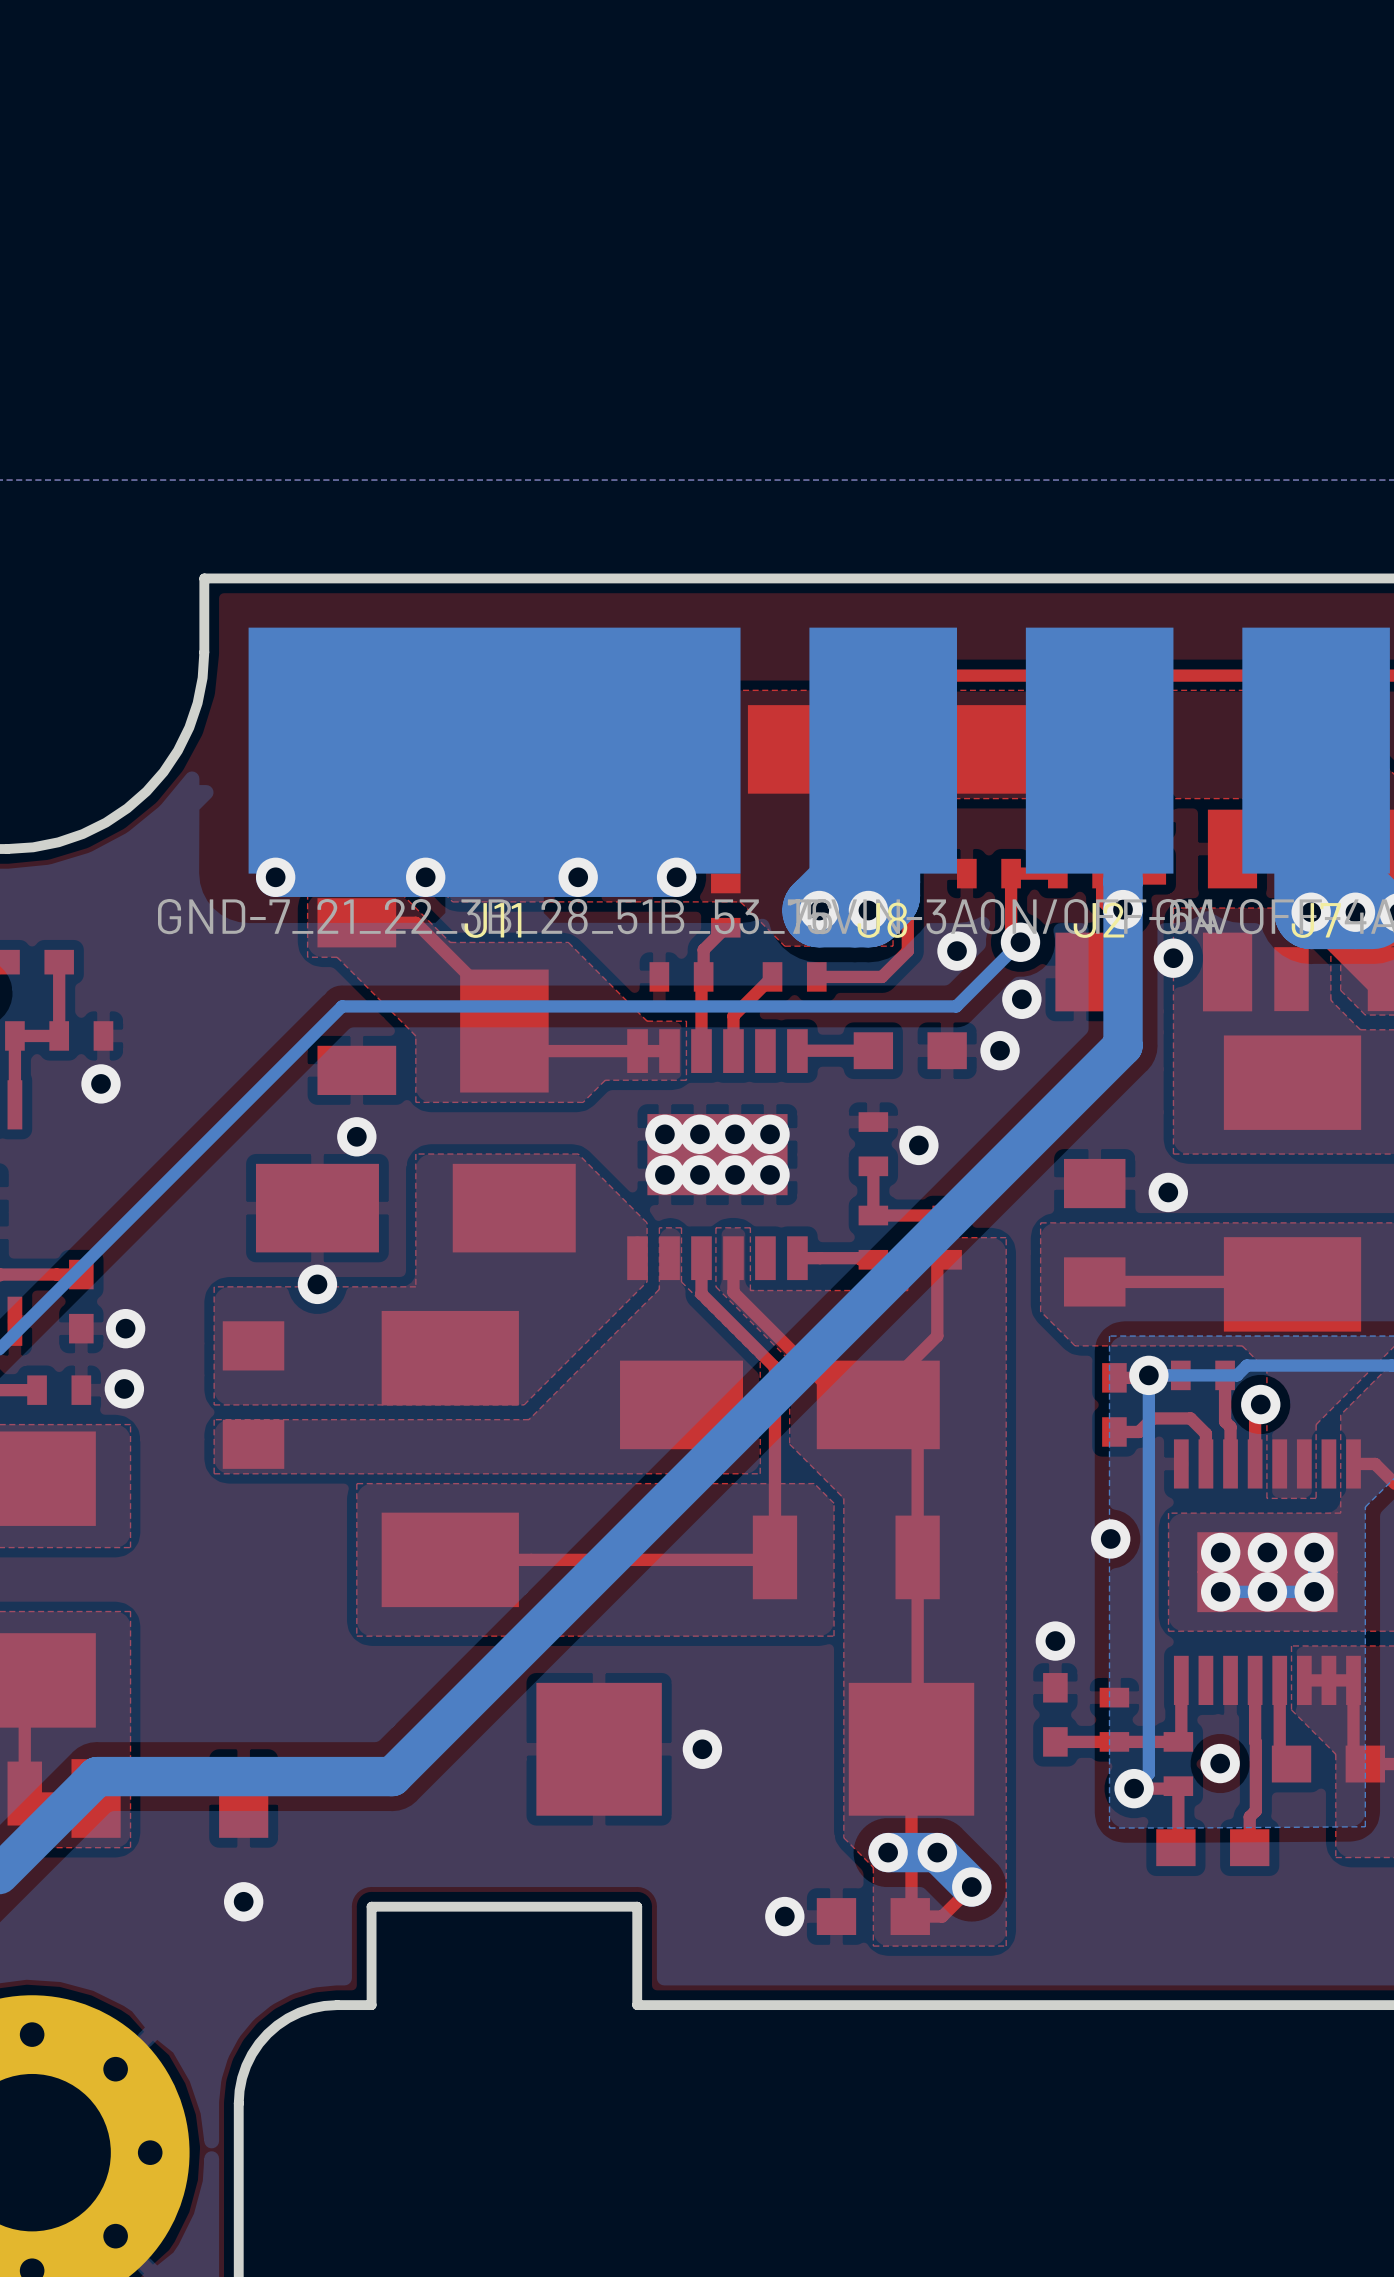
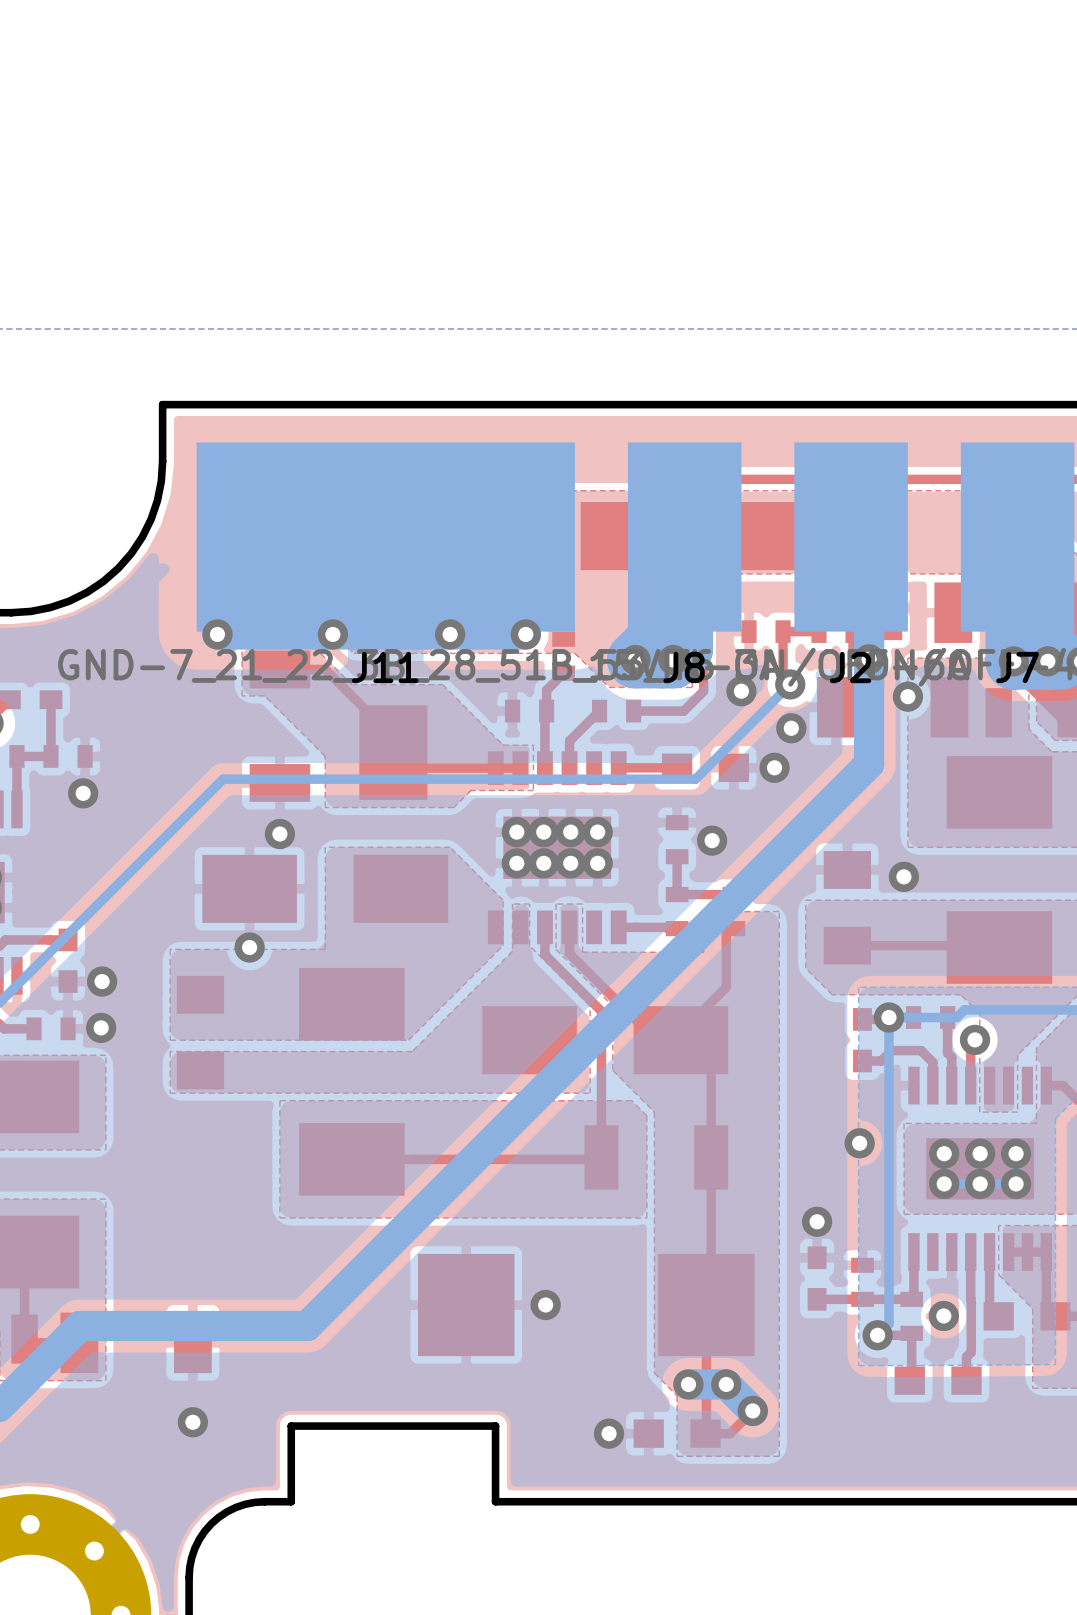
bottom track: (956, 1006) (342, 1006) (283, 1065) -> (740, 733) (695, 779) (223, 779)

